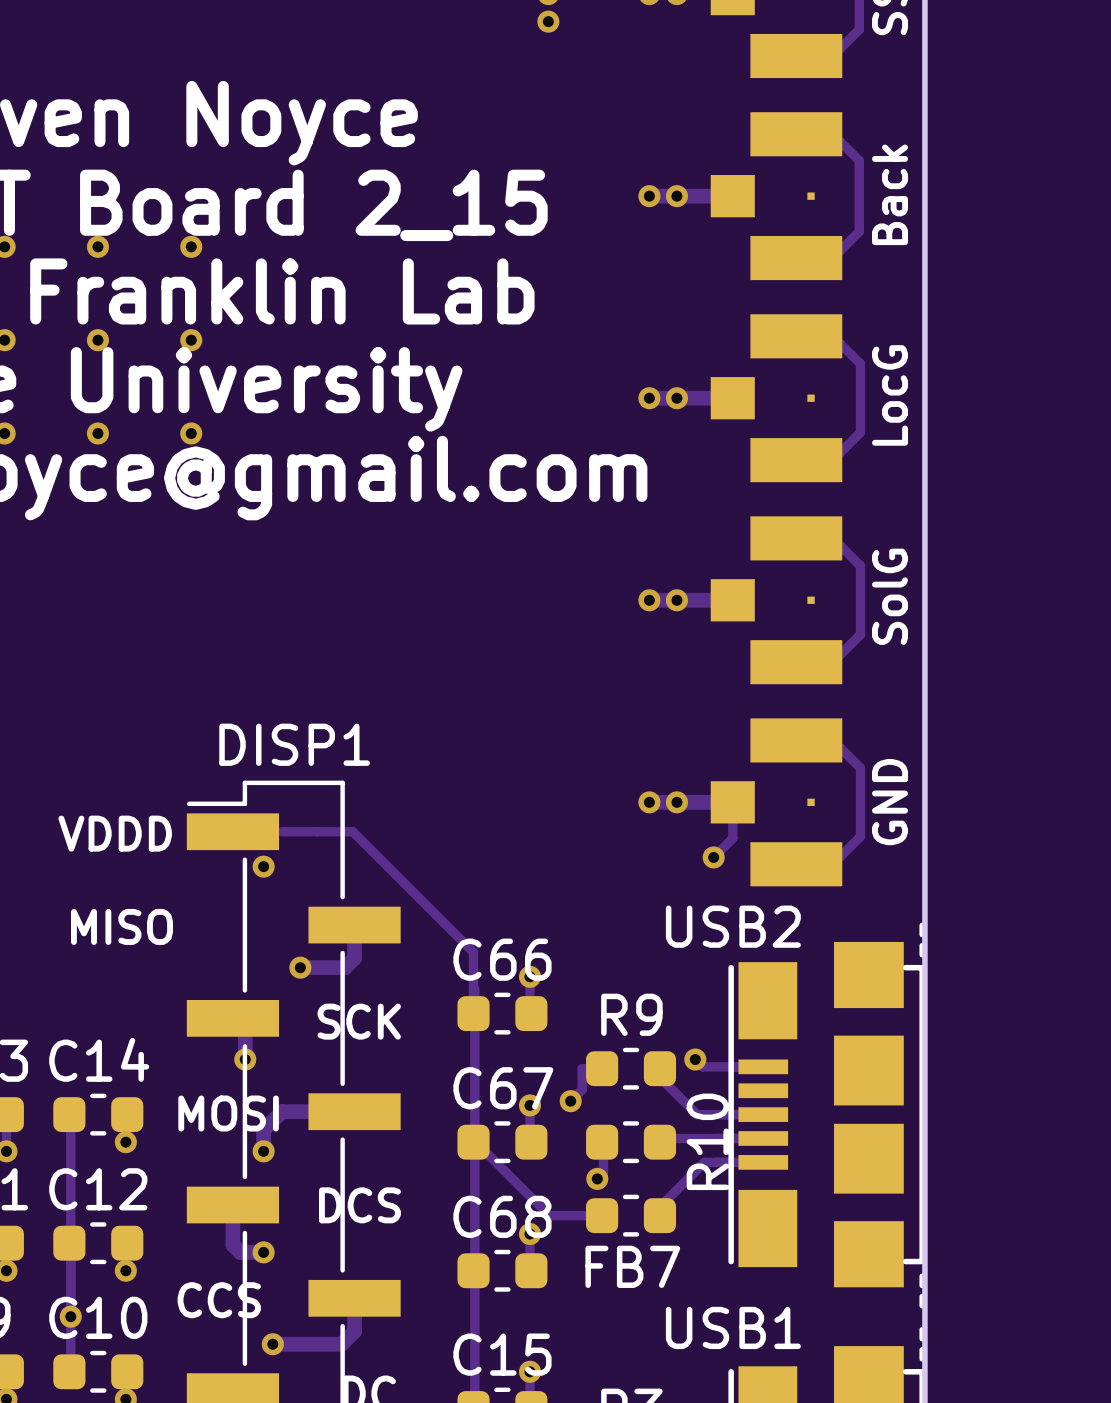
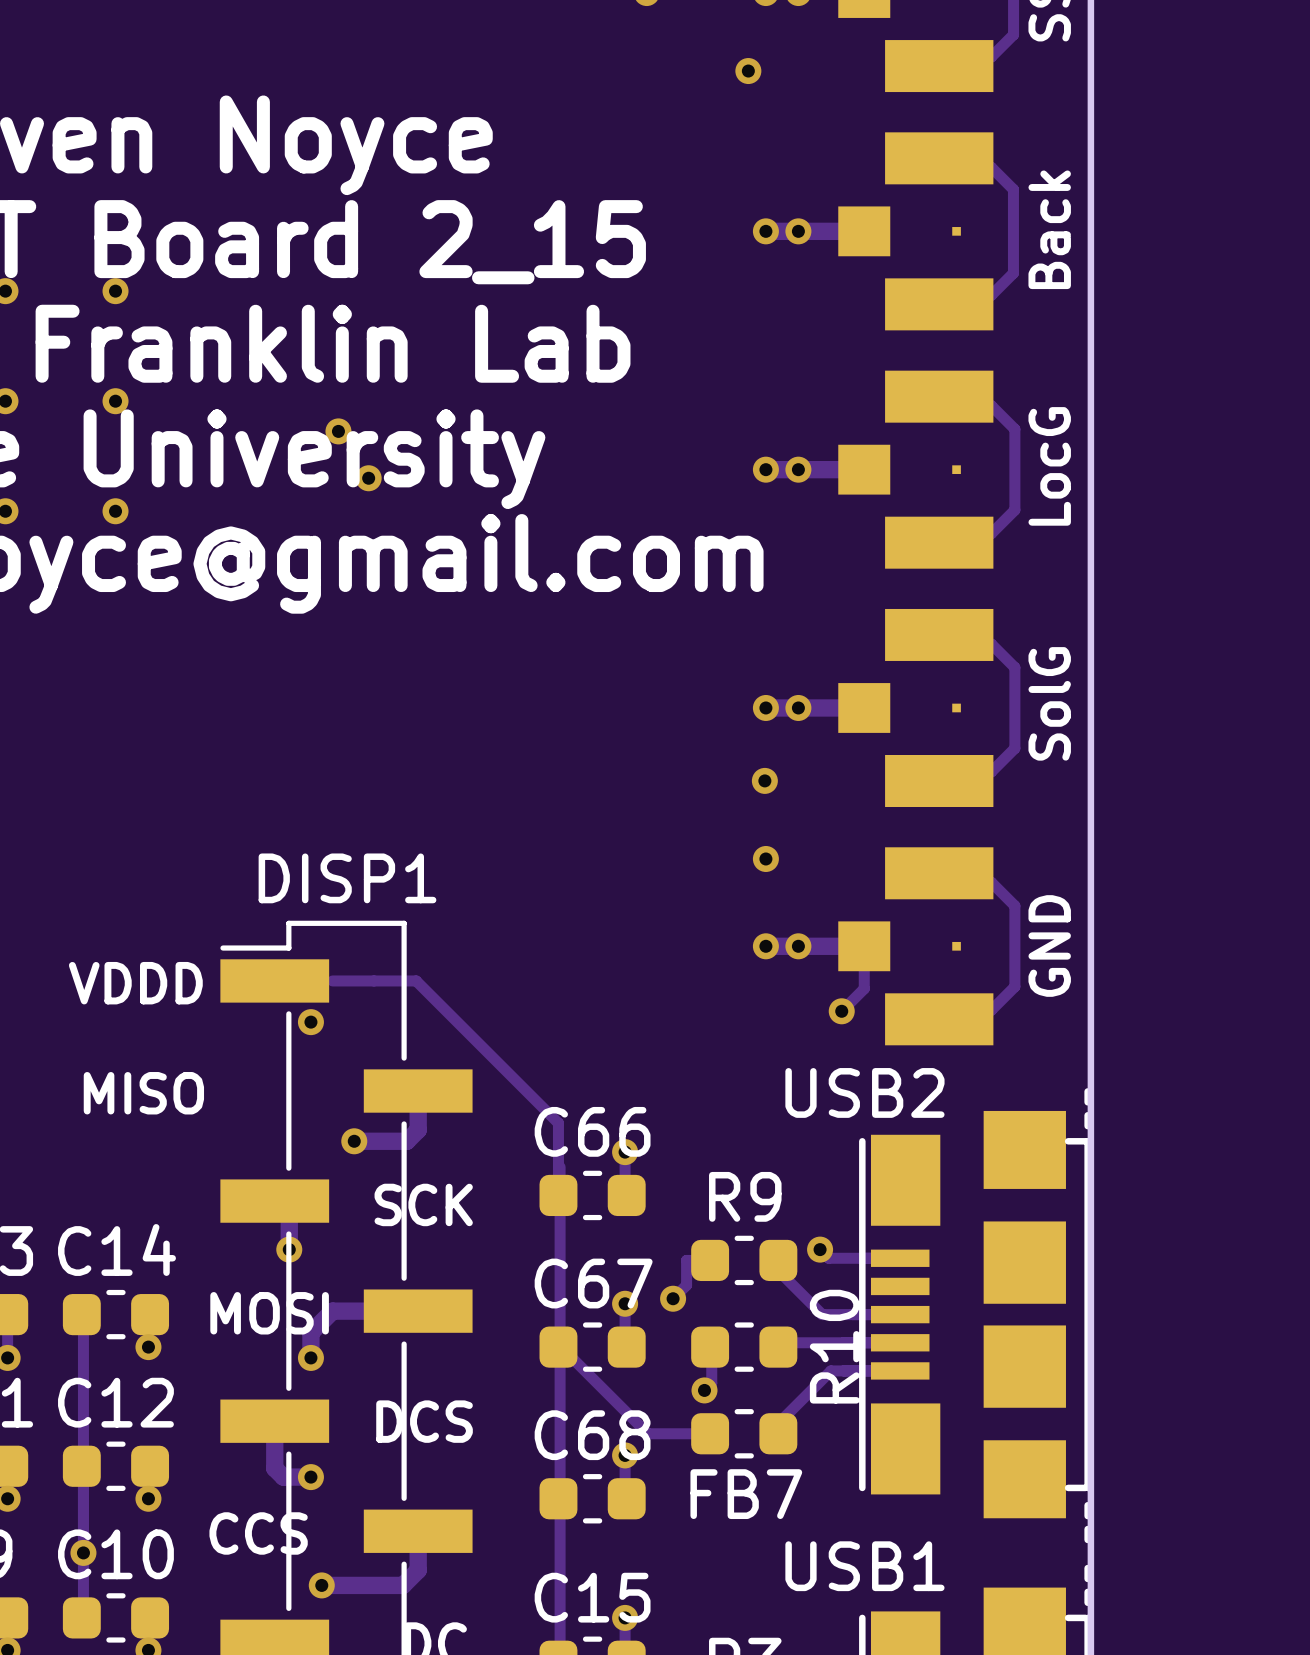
via position: (548, 21) -> (748, 71)
via: (191, 246) -> none
via: (191, 340) -> none
via: none -> (338, 431)
via: none -> (368, 478)
via: (191, 433) -> none
via: none -> (764, 780)
via: none -> (765, 858)

